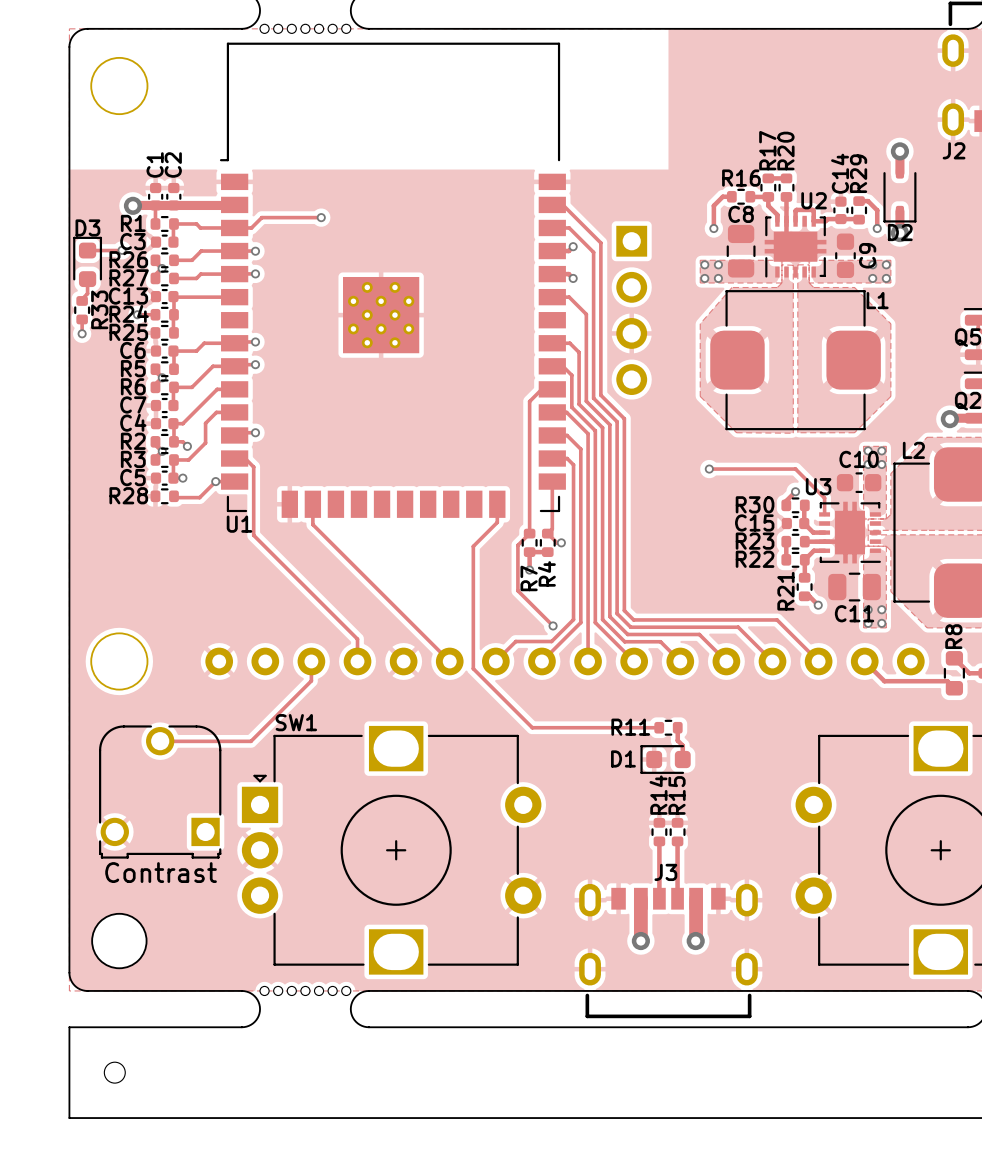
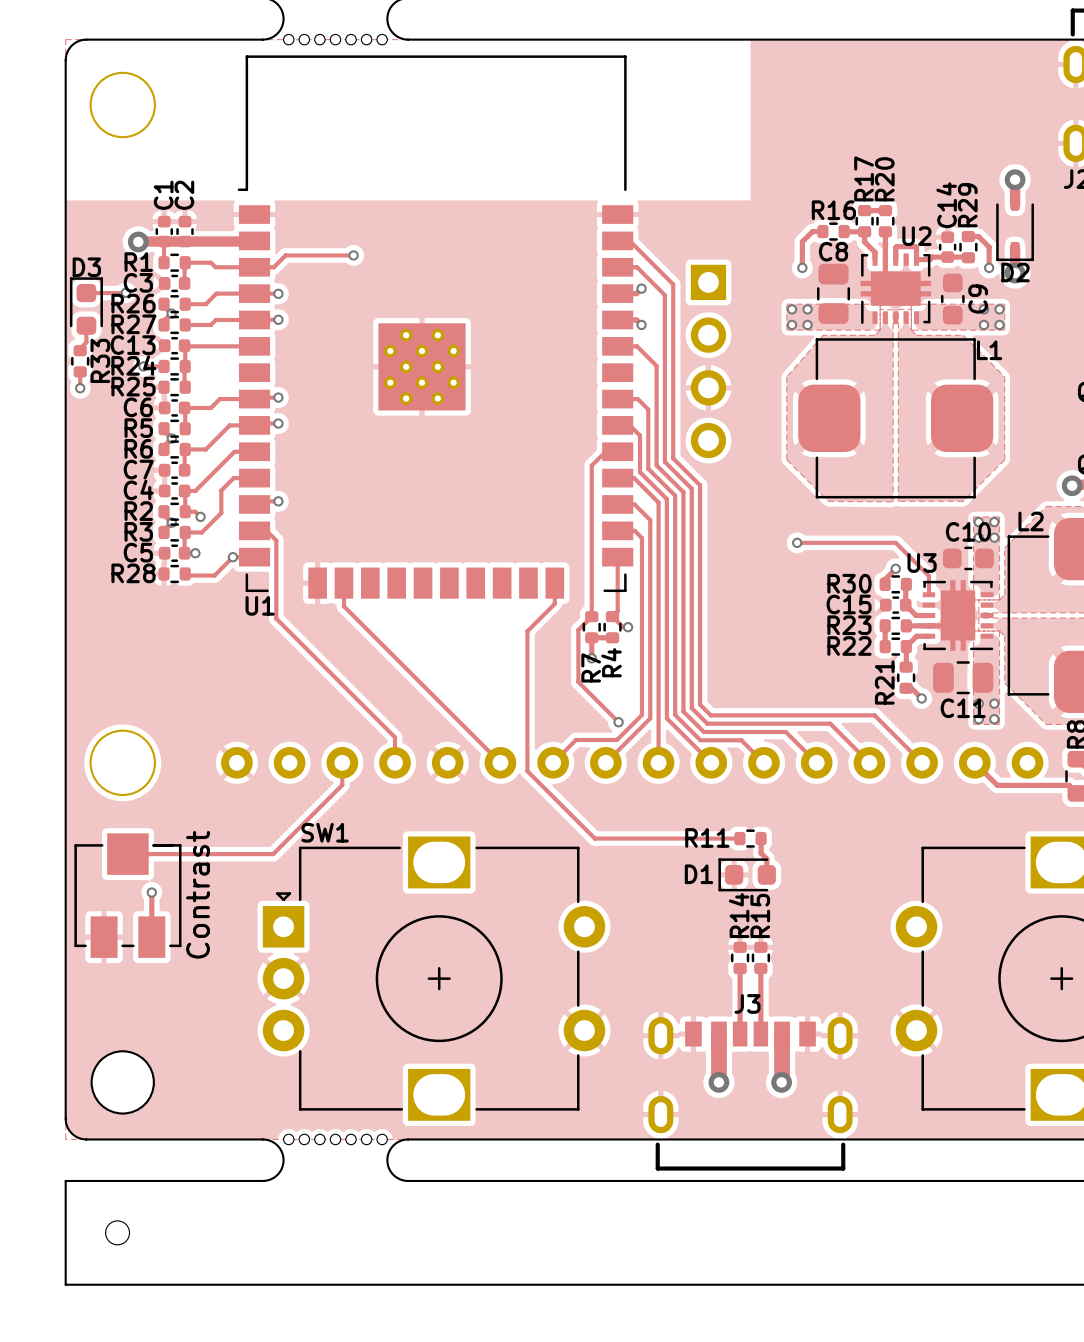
track: none -> (127, 854) (169, 854)
track: none -> (151, 892) (151, 937)
via: none -> (151, 892)
part: none -> (127, 895)
part: (160, 792) -> none
text rotation: 0° (161, 872) -> 90° counterclockwise (198, 894)

